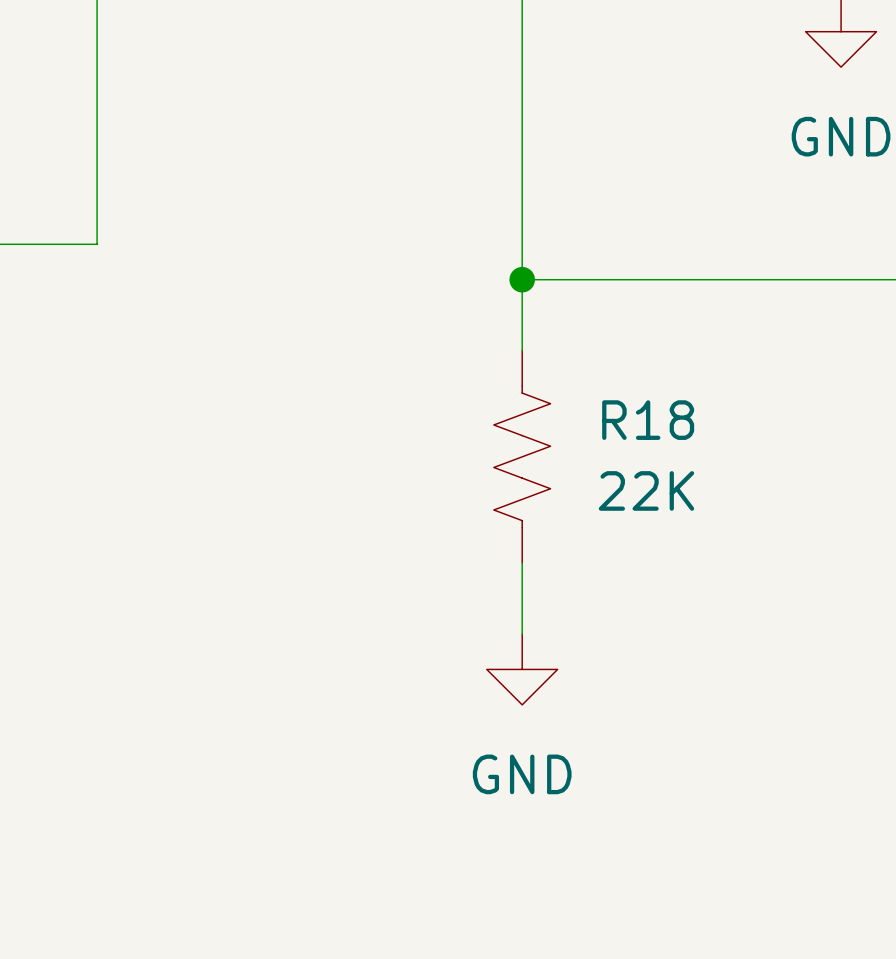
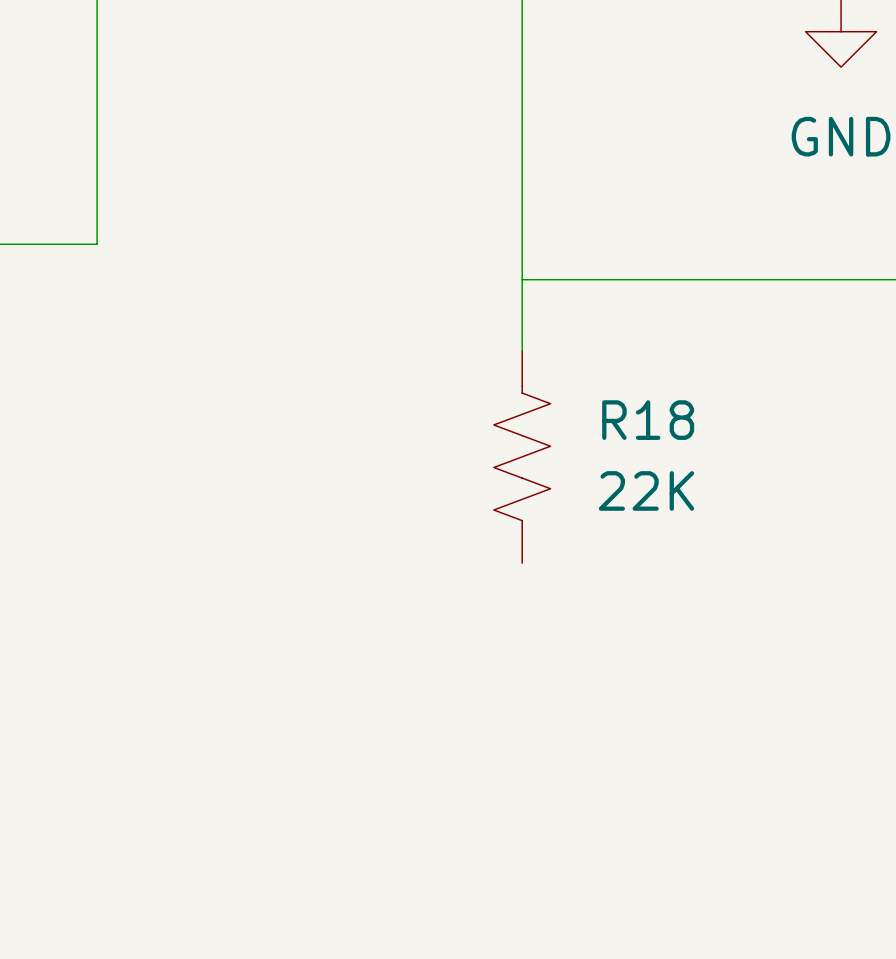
junction: (522, 279) -> none
wire: (522, 563) (522, 634) -> none
power symbol: GND (522, 669) -> none

